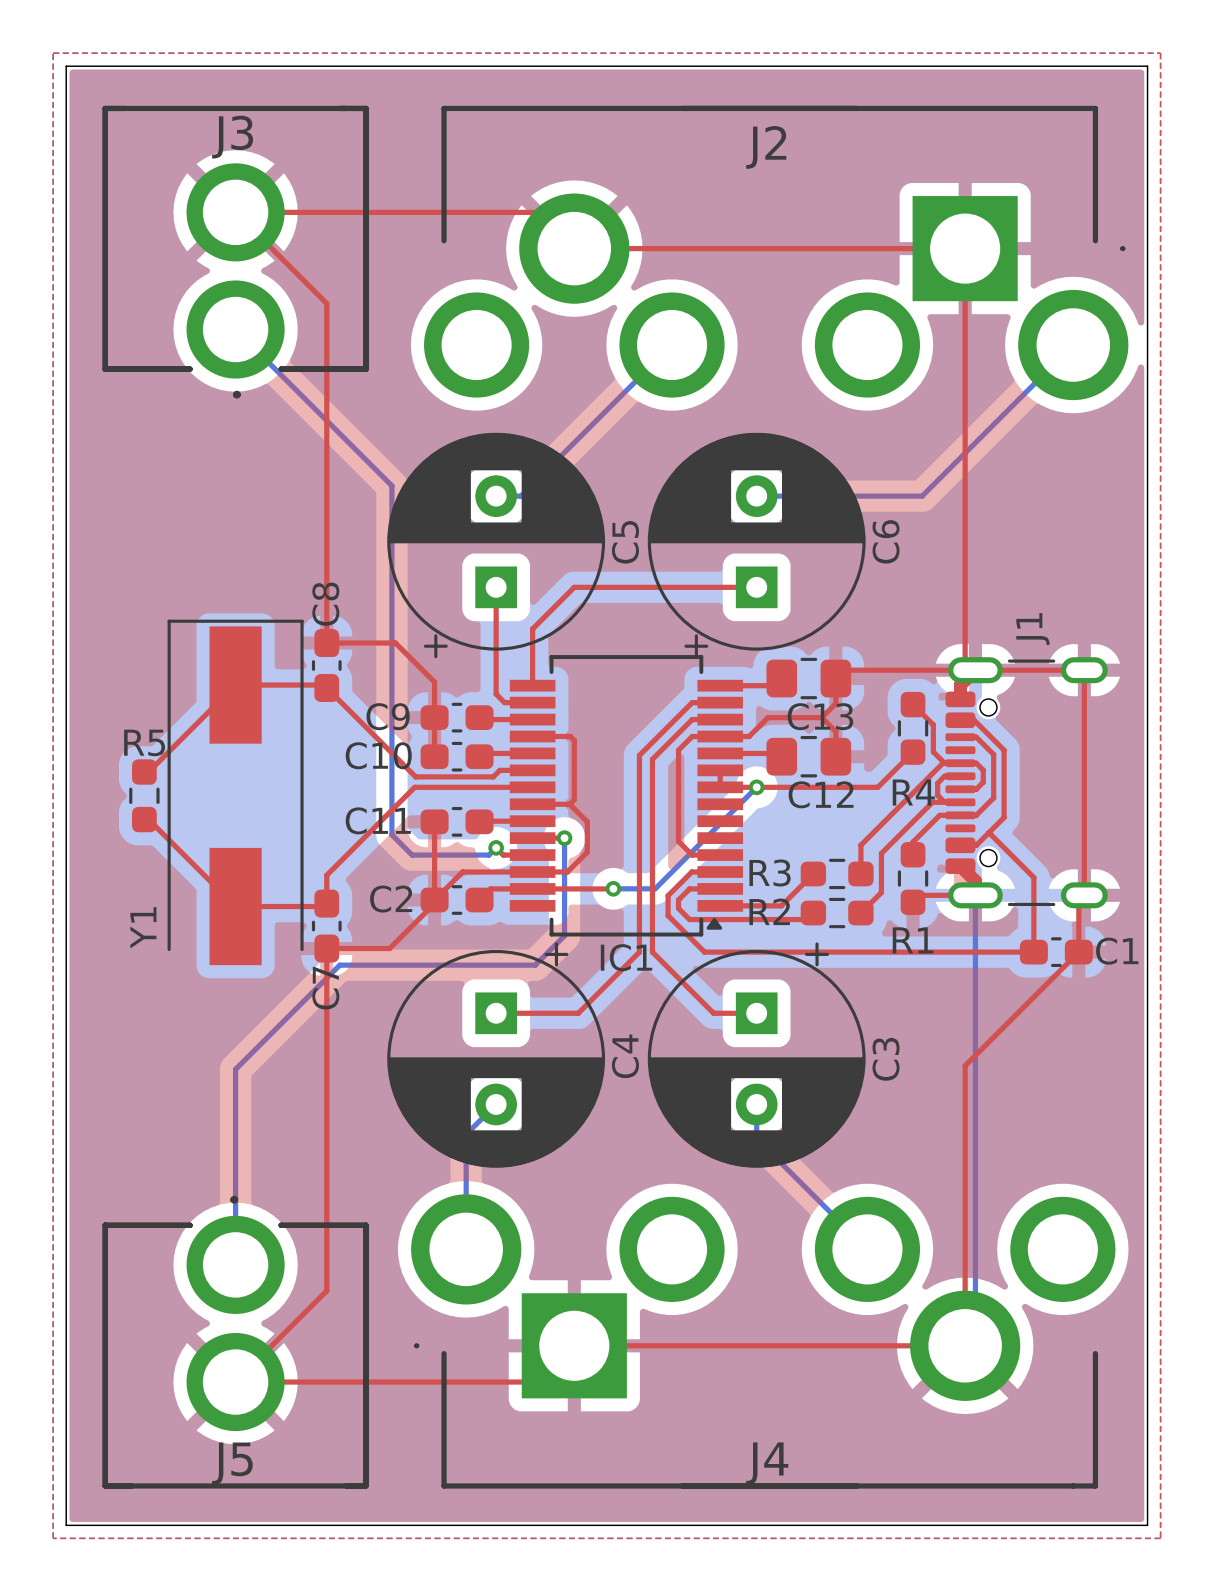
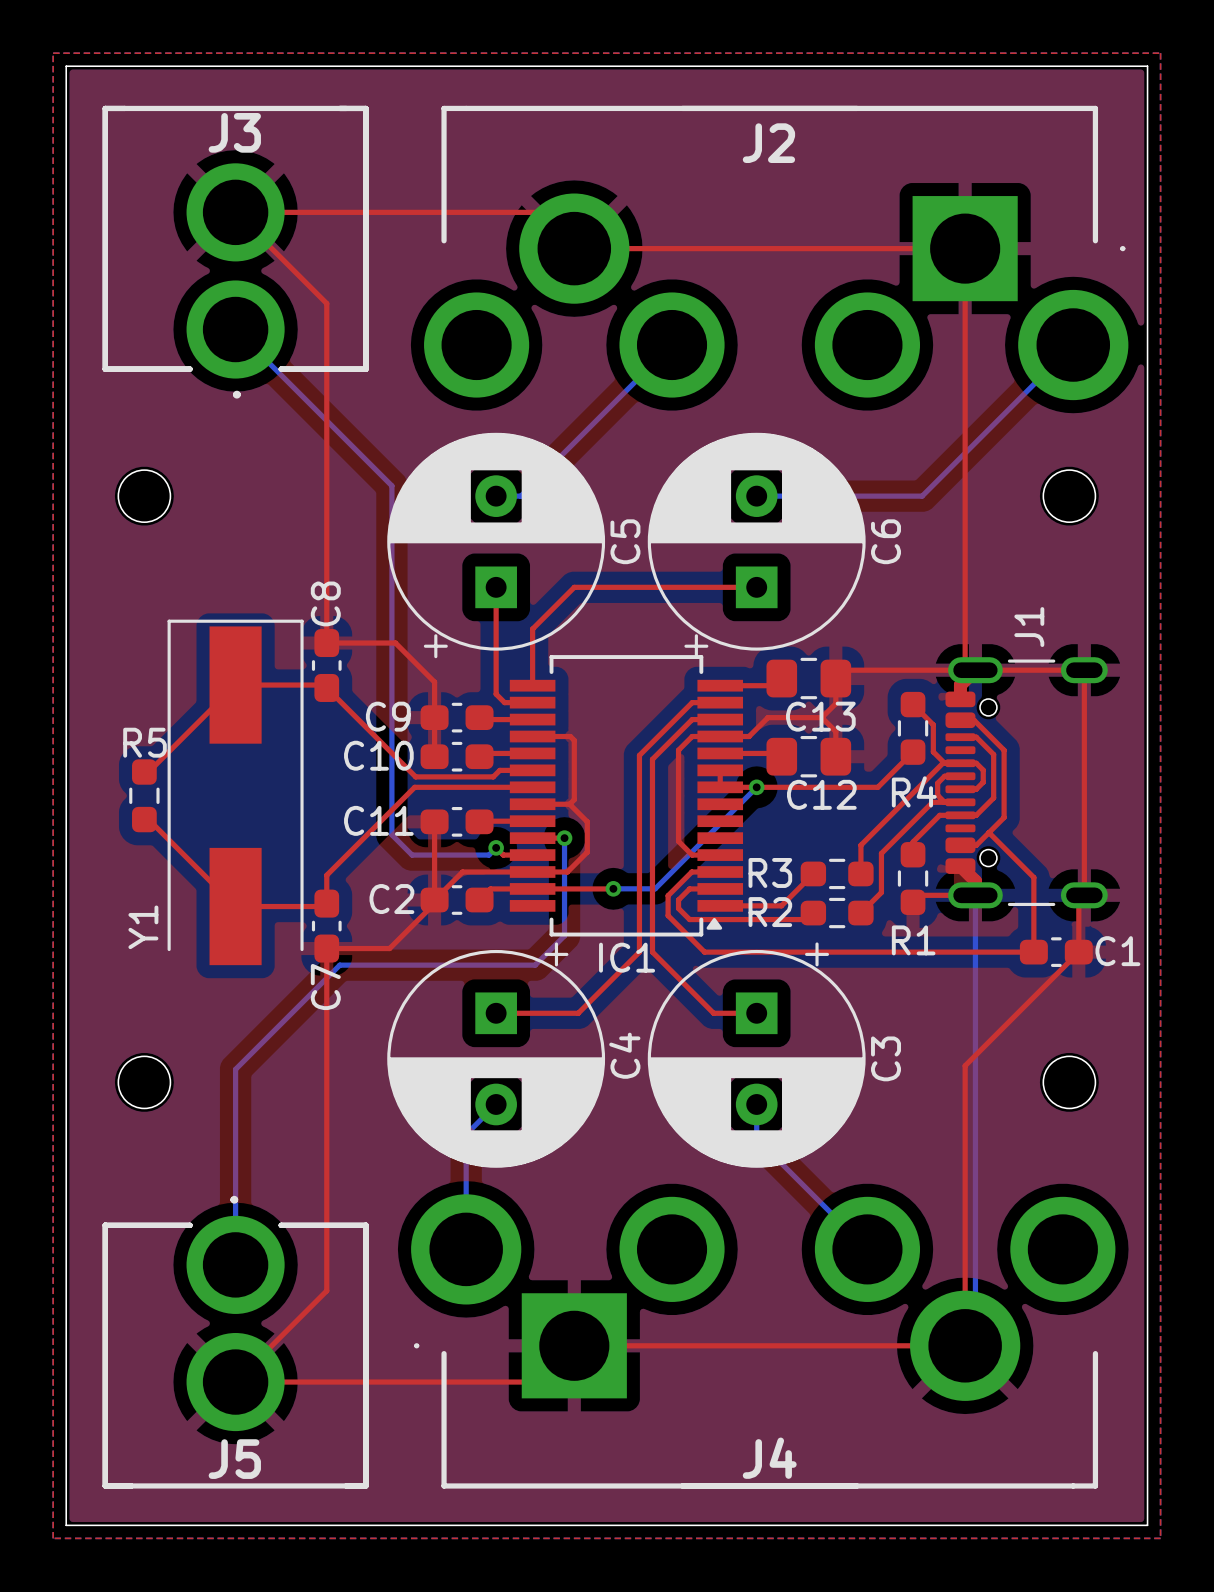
round board edge: none -> [117, 469, 172, 523]
round board edge: none -> [1042, 469, 1097, 523]
round board edge: none -> [117, 1055, 172, 1110]
round board edge: none -> [1042, 1055, 1097, 1110]

